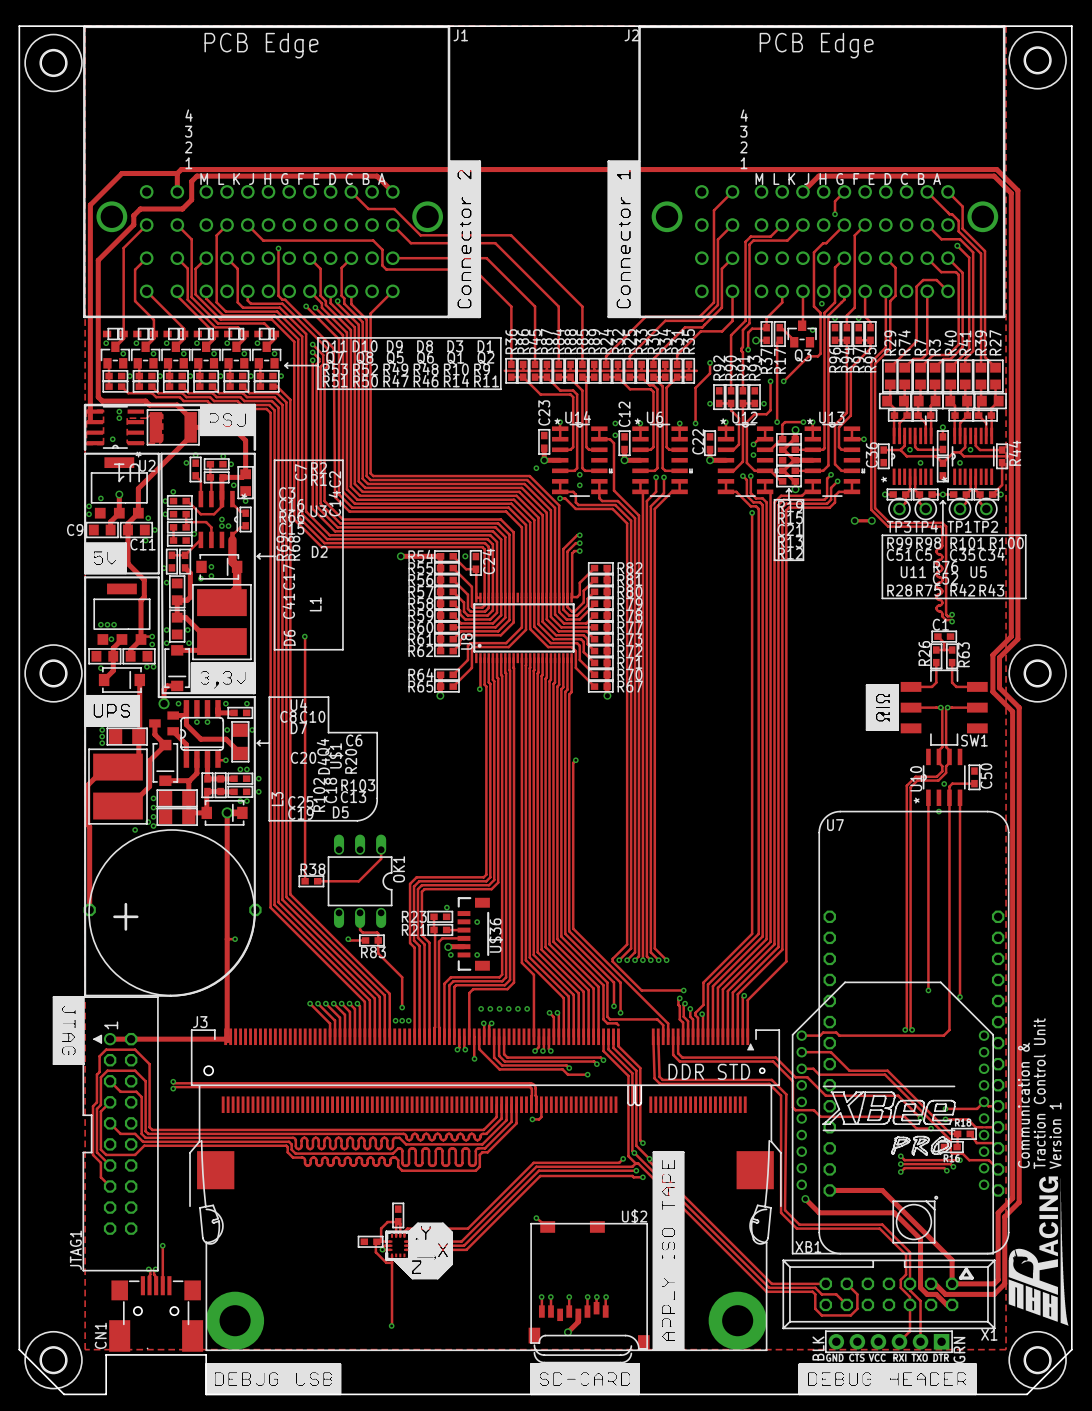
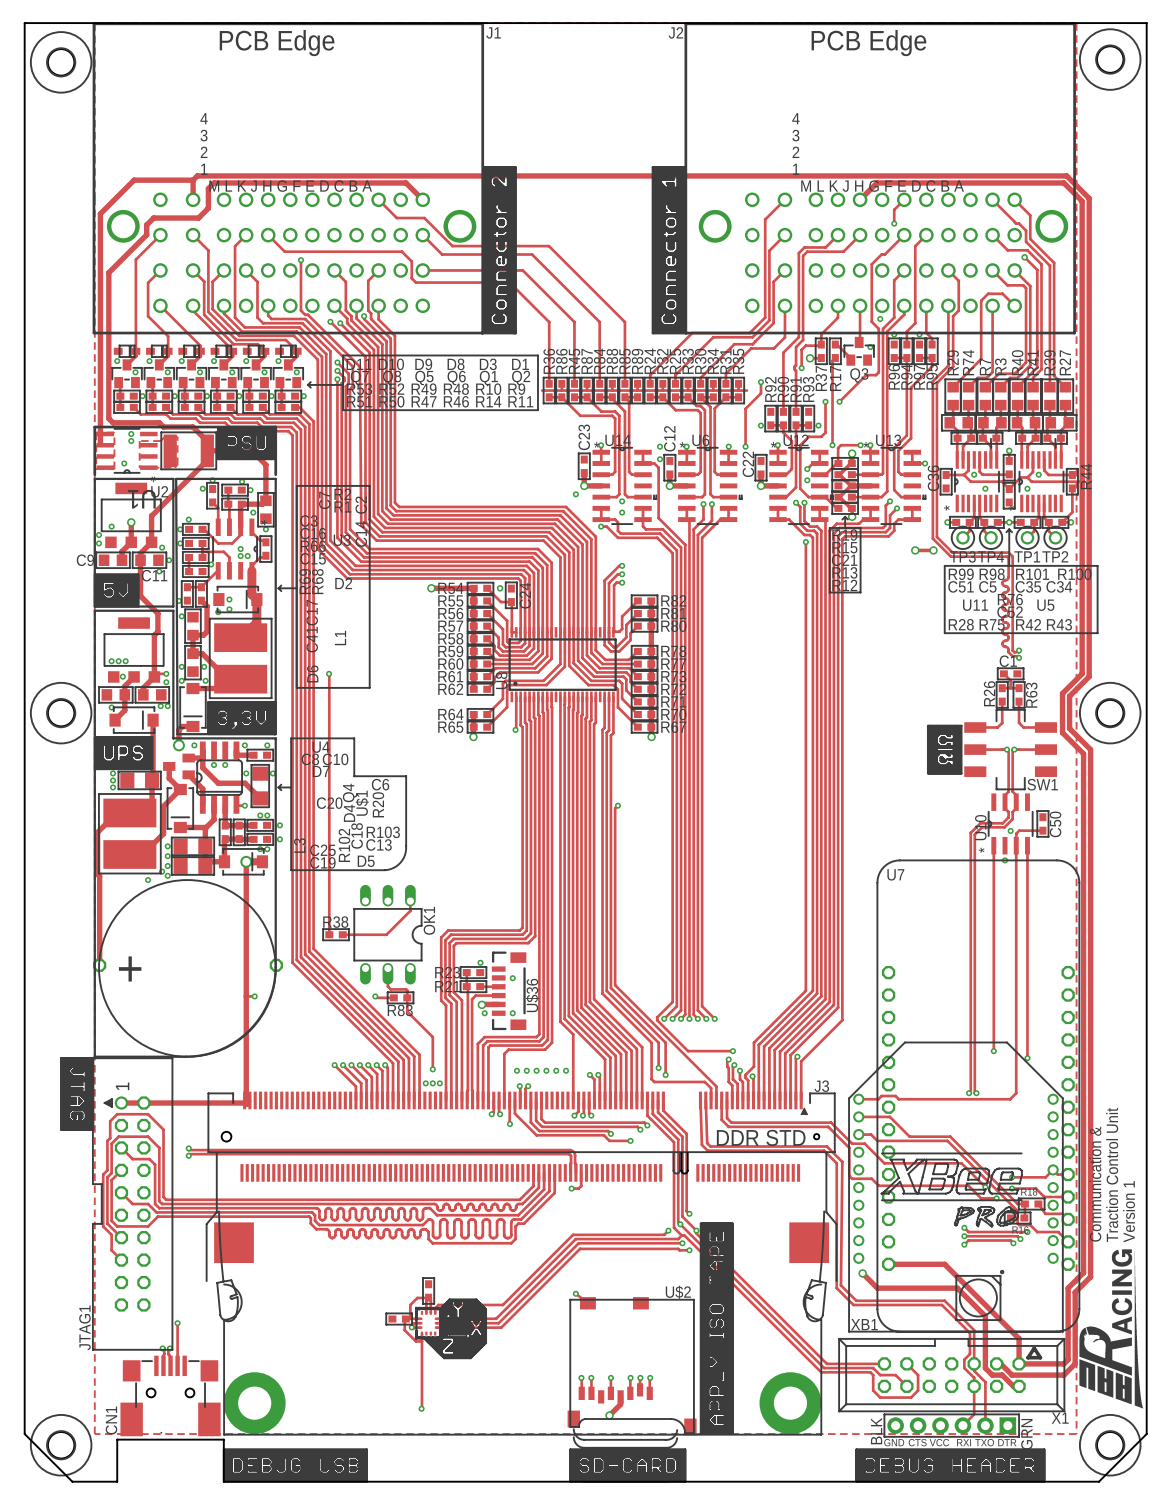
track: (392, 291) (370, 313) (370, 473) (373, 476) (529, 476) (559, 505) (559, 612) (566, 619) (579, 619) (594, 603) -> none
R79: (600, 603) -> none
track: (559, 658) (559, 684) (557, 686) (557, 939) (603, 985) (603, 1019) (607, 1023) (616, 1023) (618, 1025) -> none
J3 name position: J3 (200, 1022) -> J3 (821, 1086)

